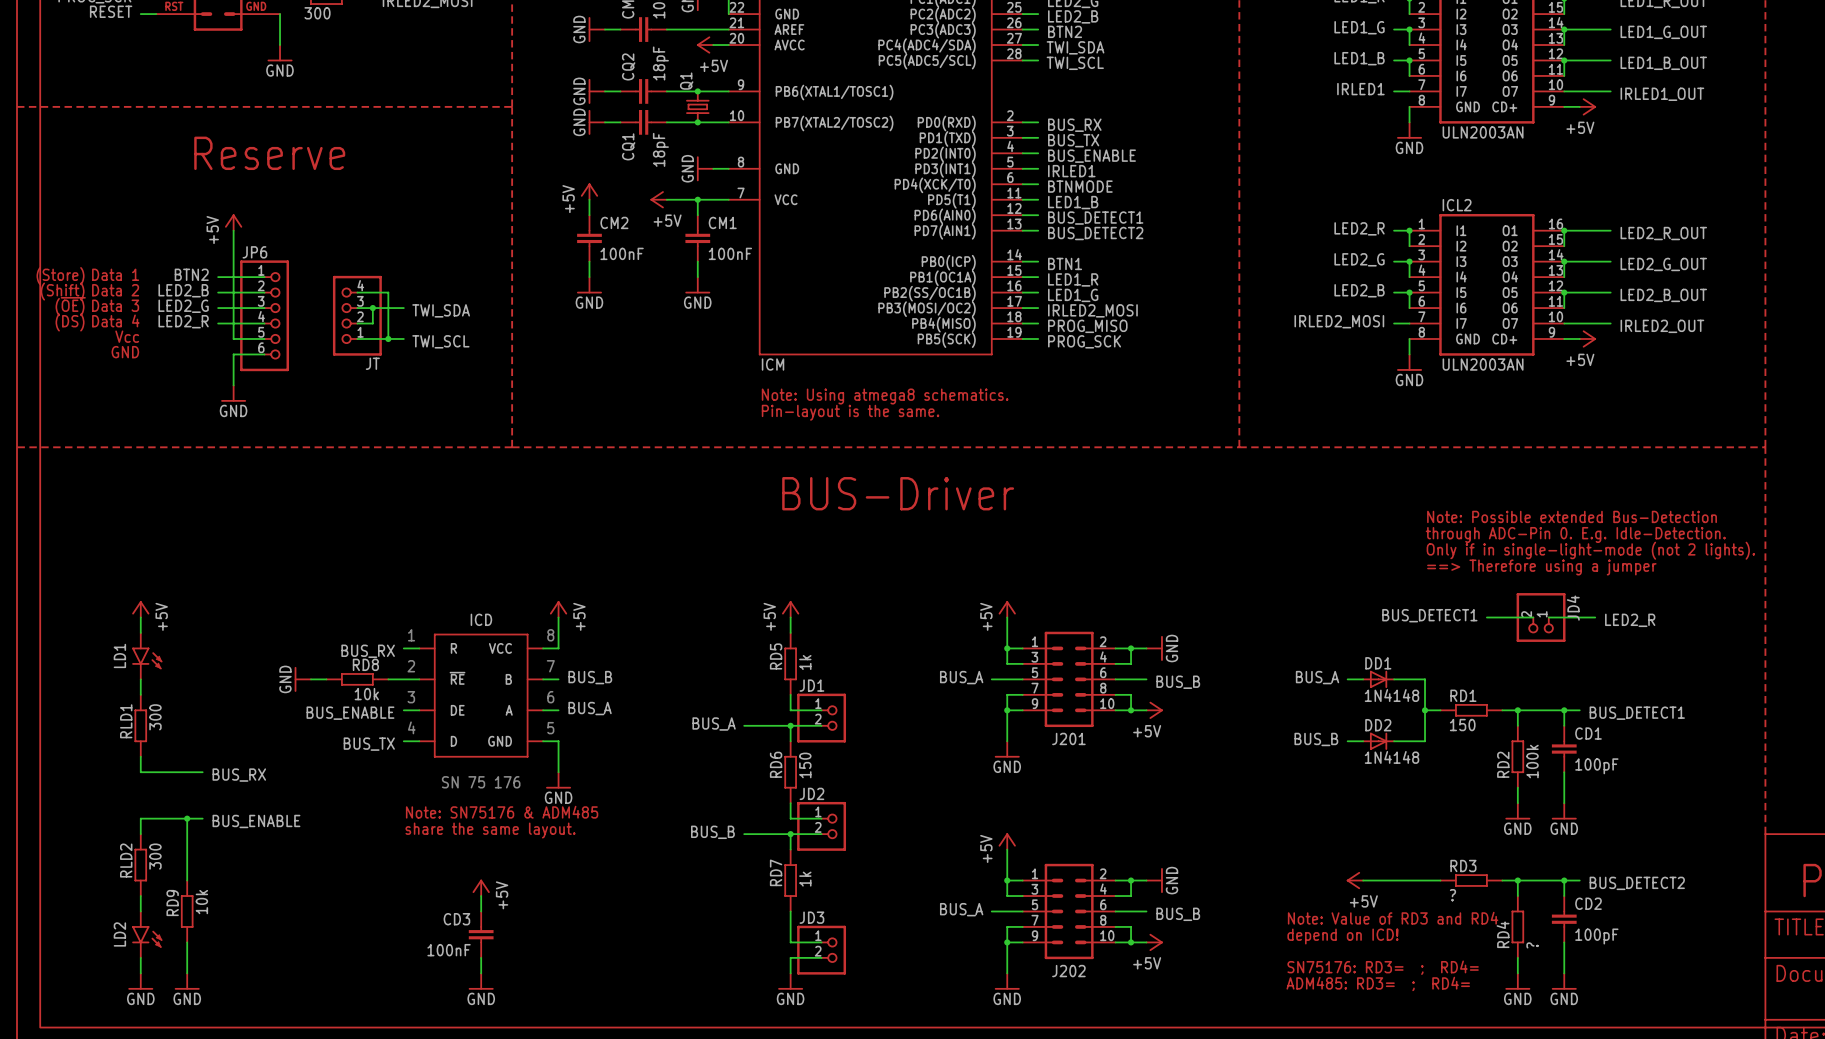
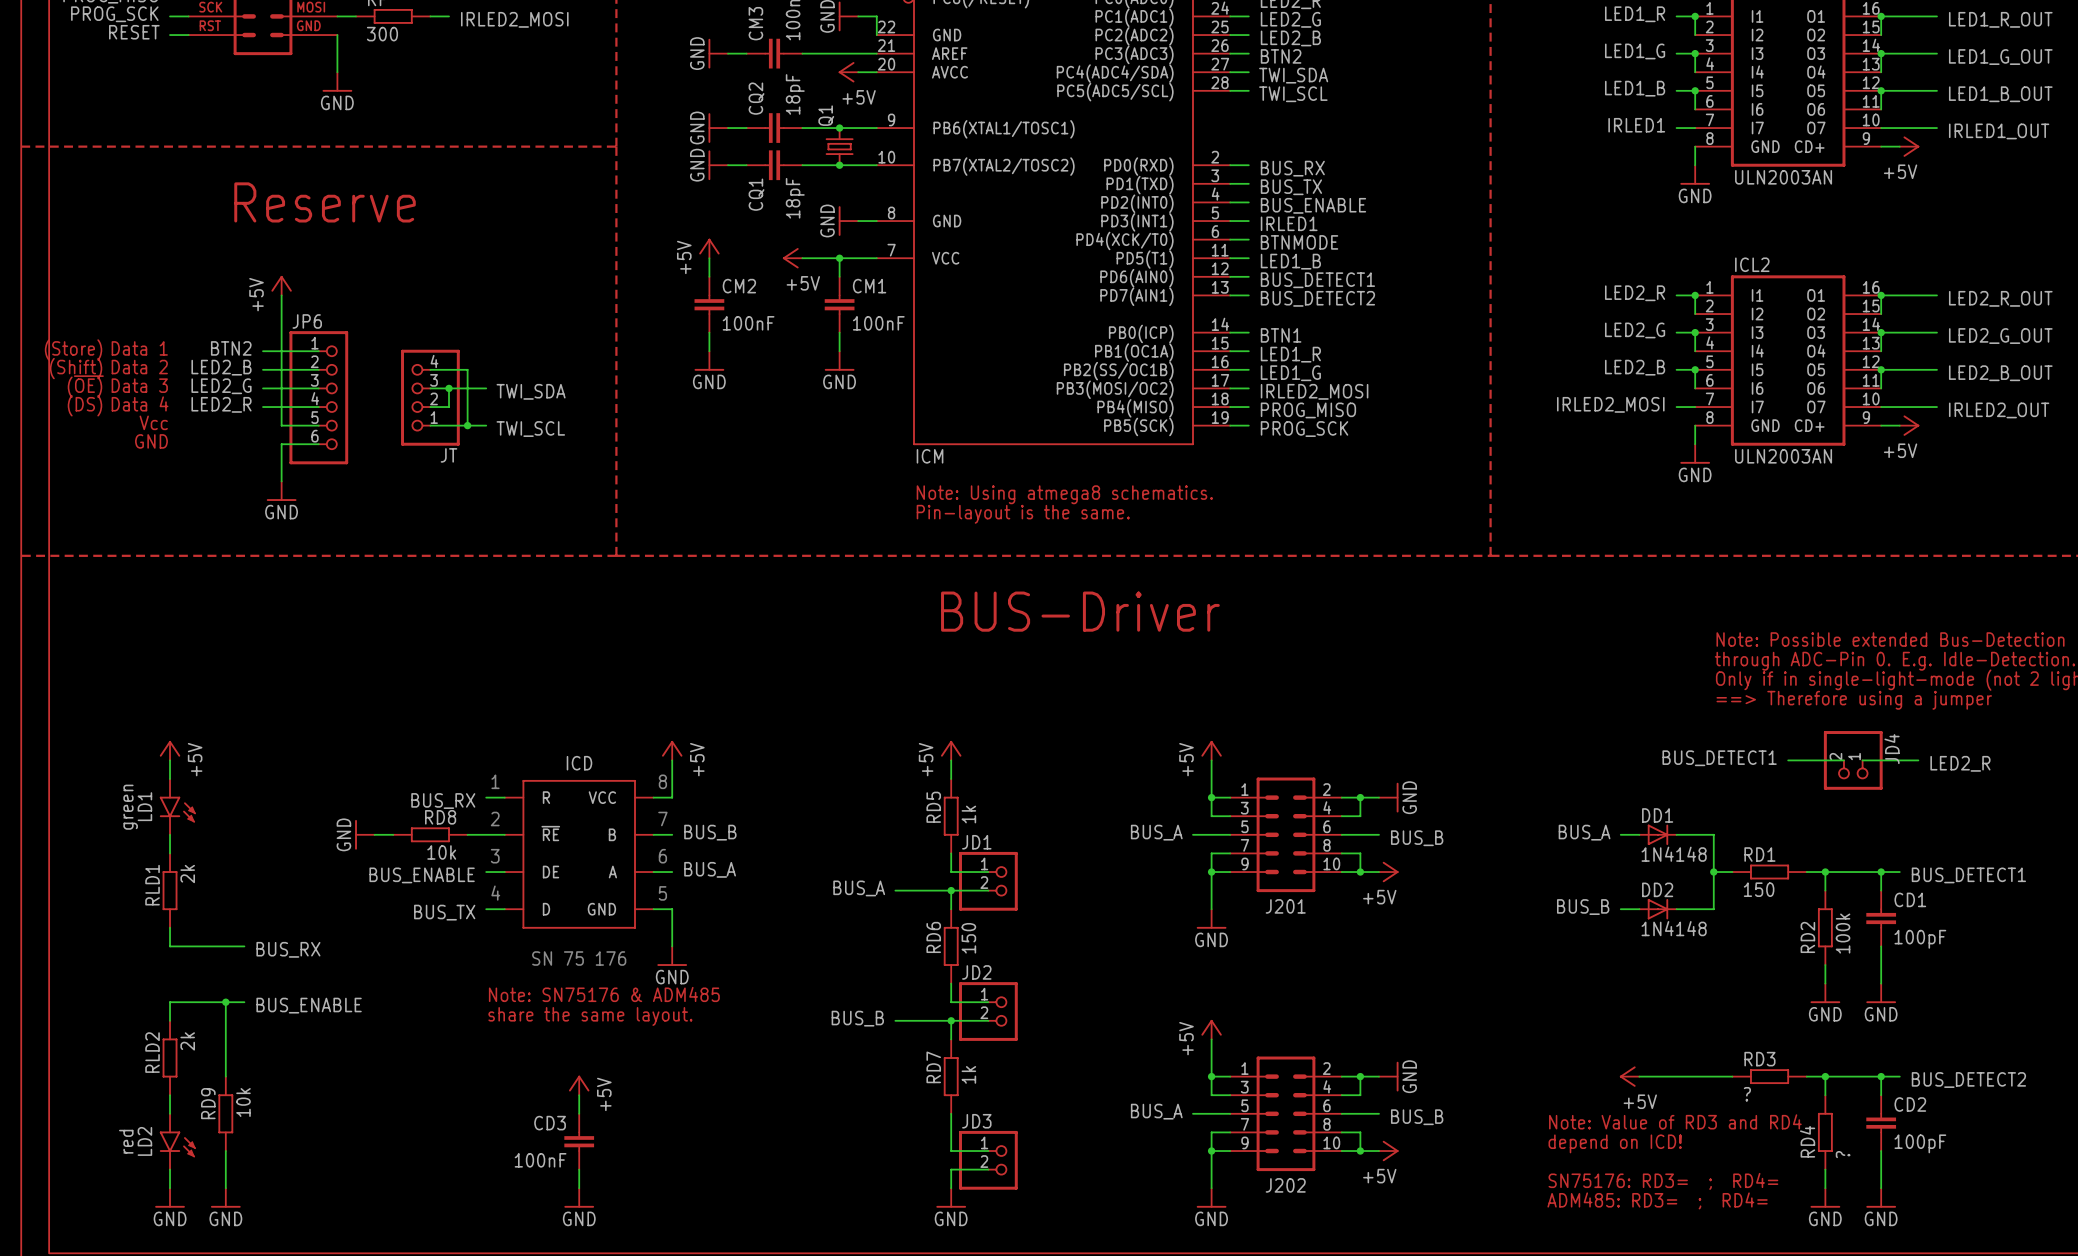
LD1 value: none -> green (130, 807)
RLD1 value: 300 (155, 717) -> 2k (187, 874)
RLD2 value: 300 (155, 856) -> 2k (187, 1041)
LD2 value: none -> red (126, 1141)

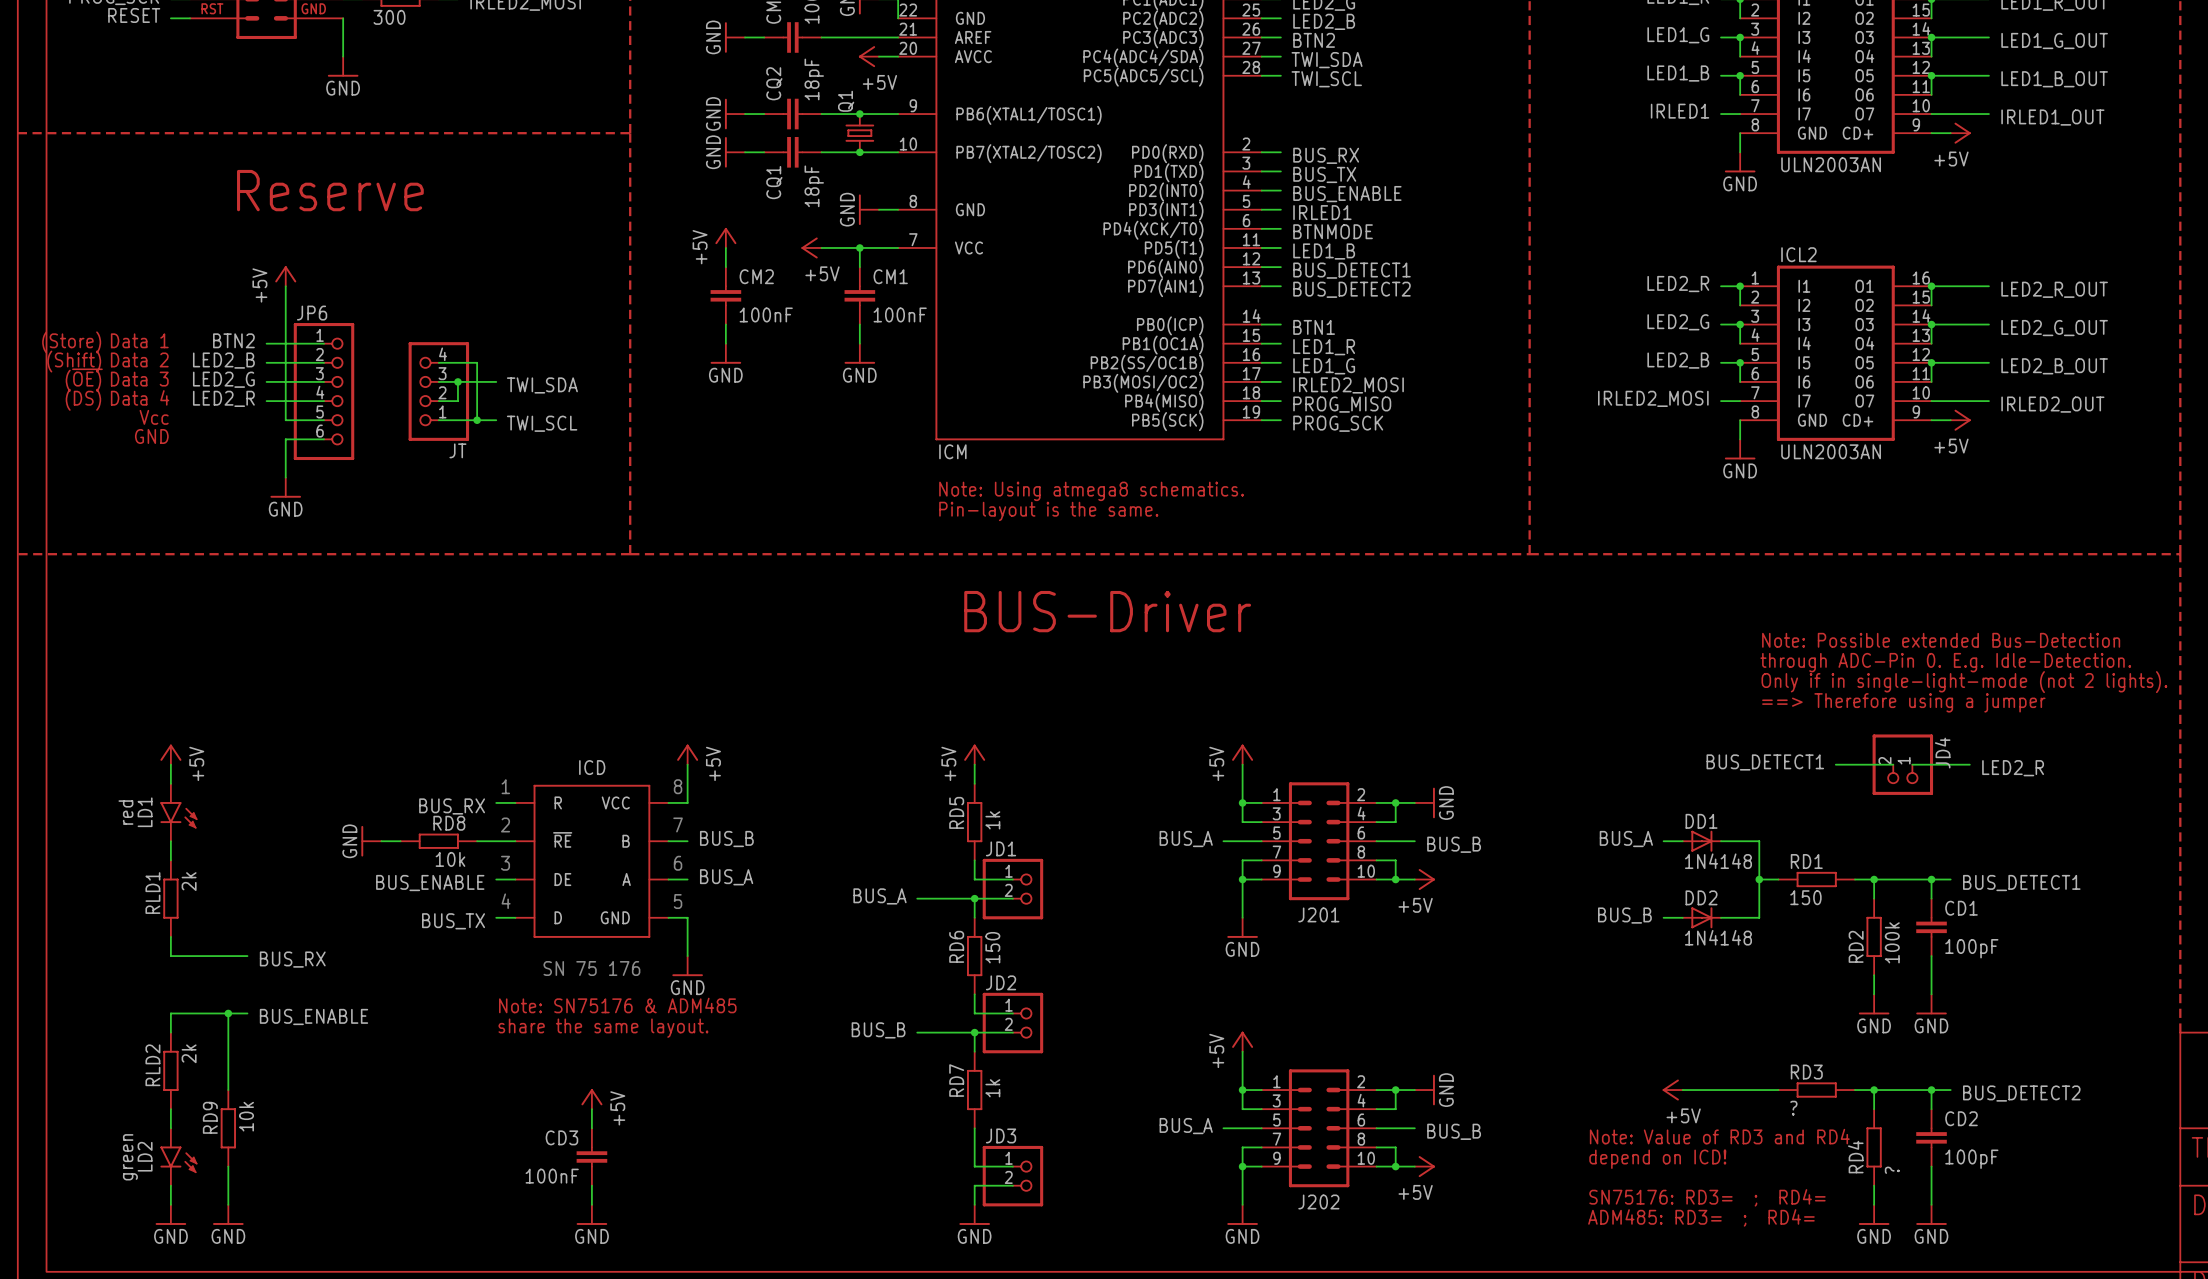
LD1 value: green (130, 807) -> red (125, 812)
LD2 value: red (126, 1141) -> green (130, 1157)

